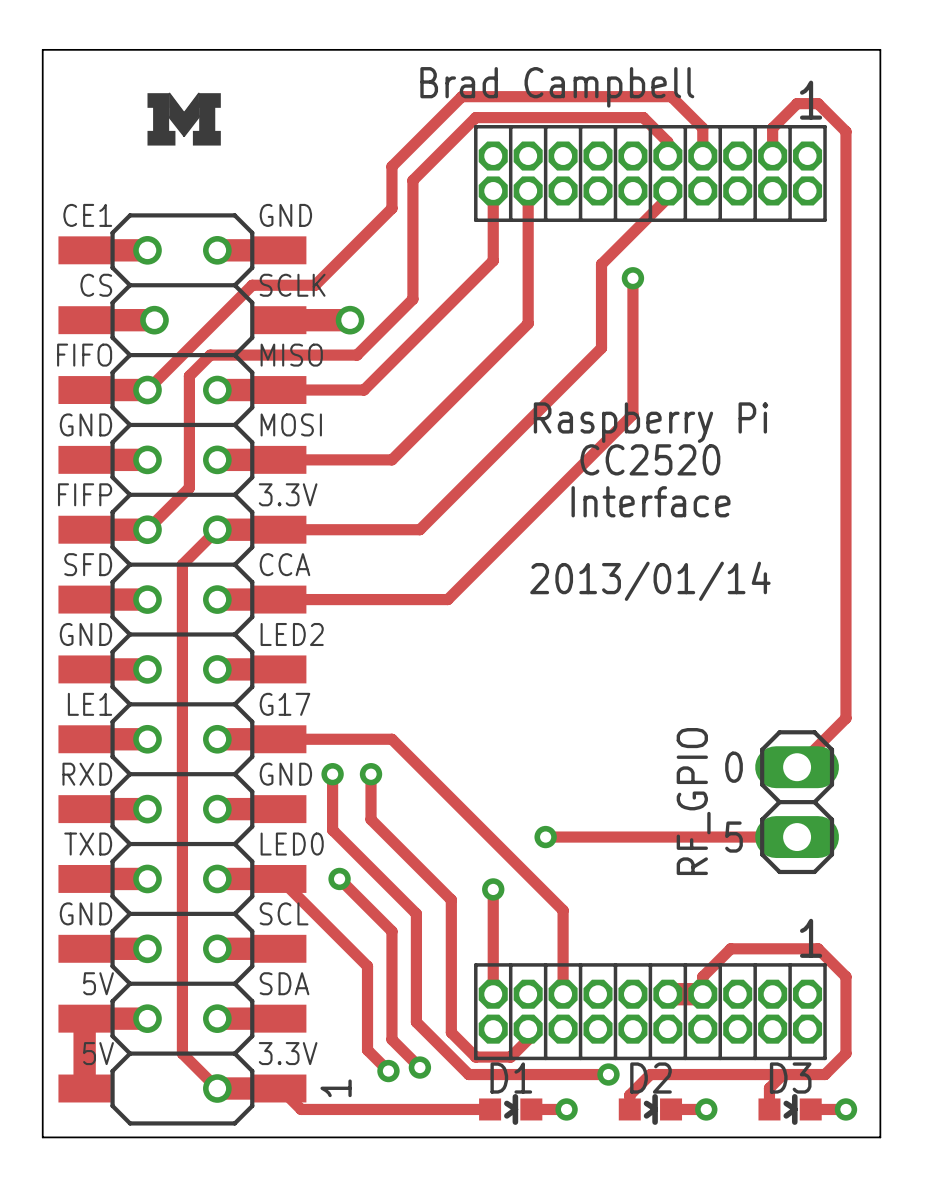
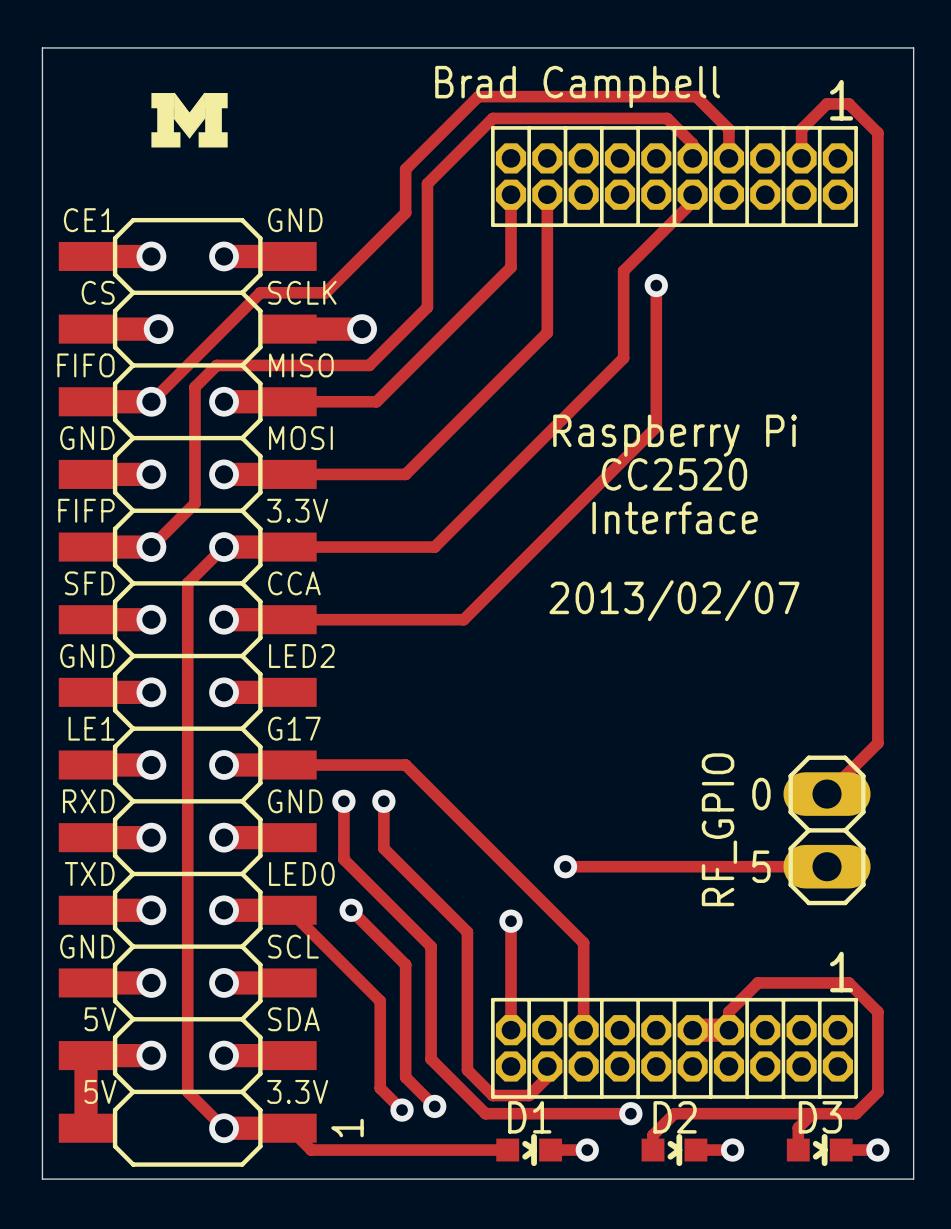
text: 2013/01/14 (650, 581) -> 2013/02/07 (674, 600)

